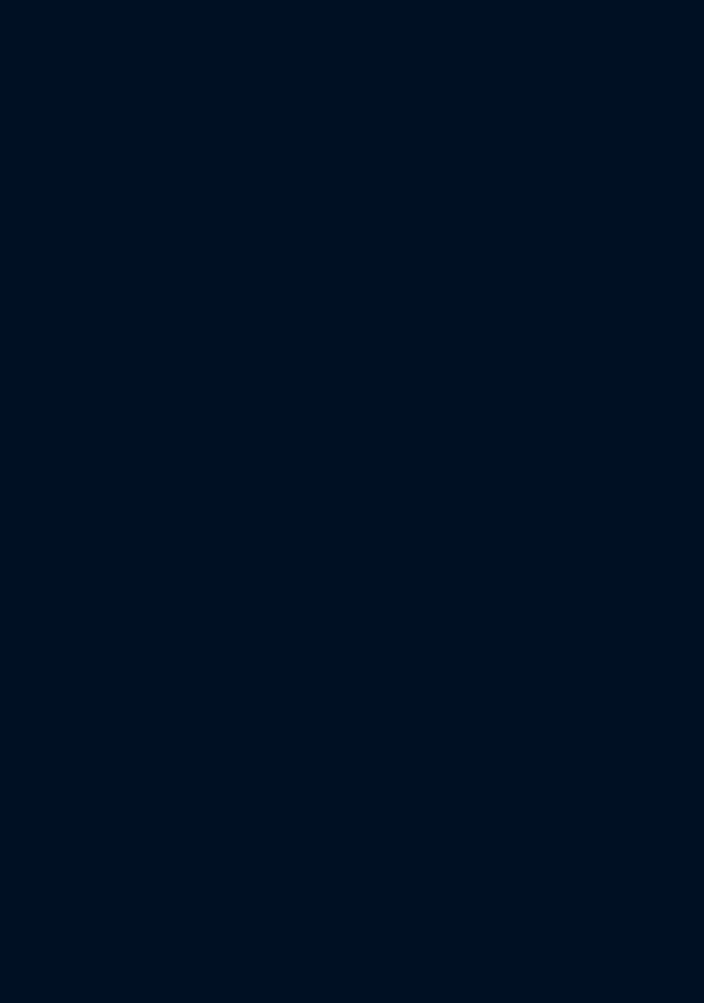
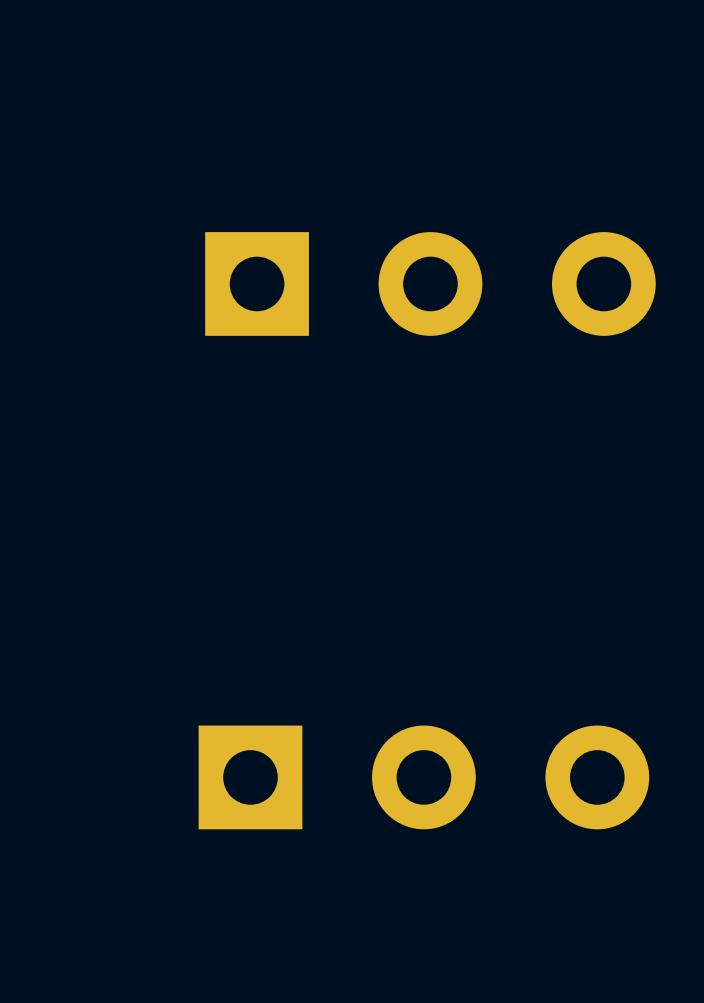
part: none -> (430, 283)
part: none -> (423, 777)

